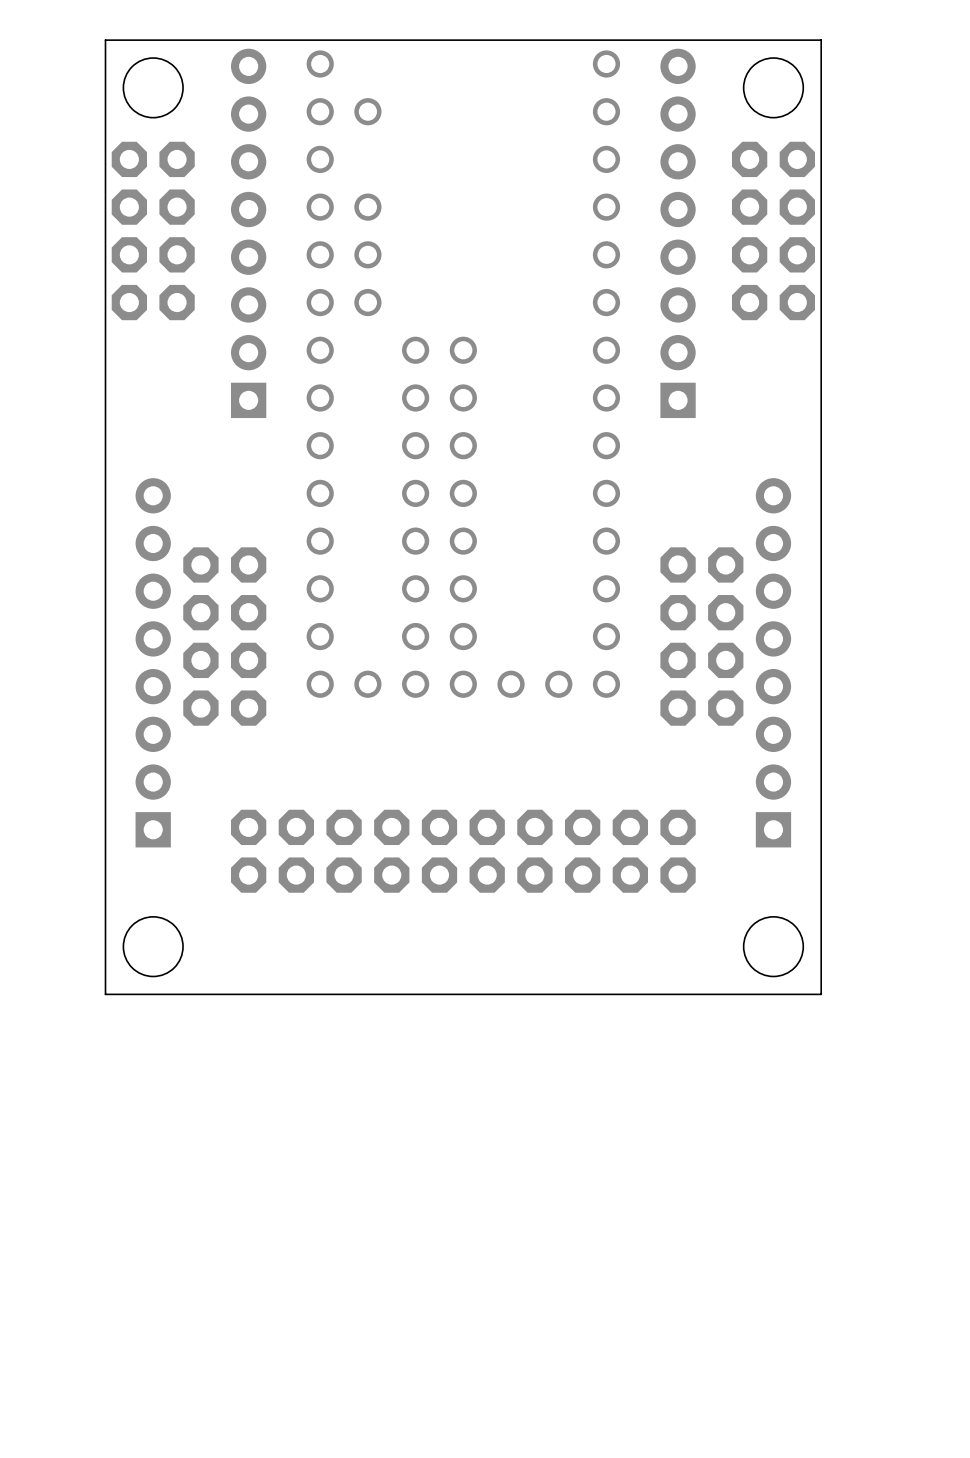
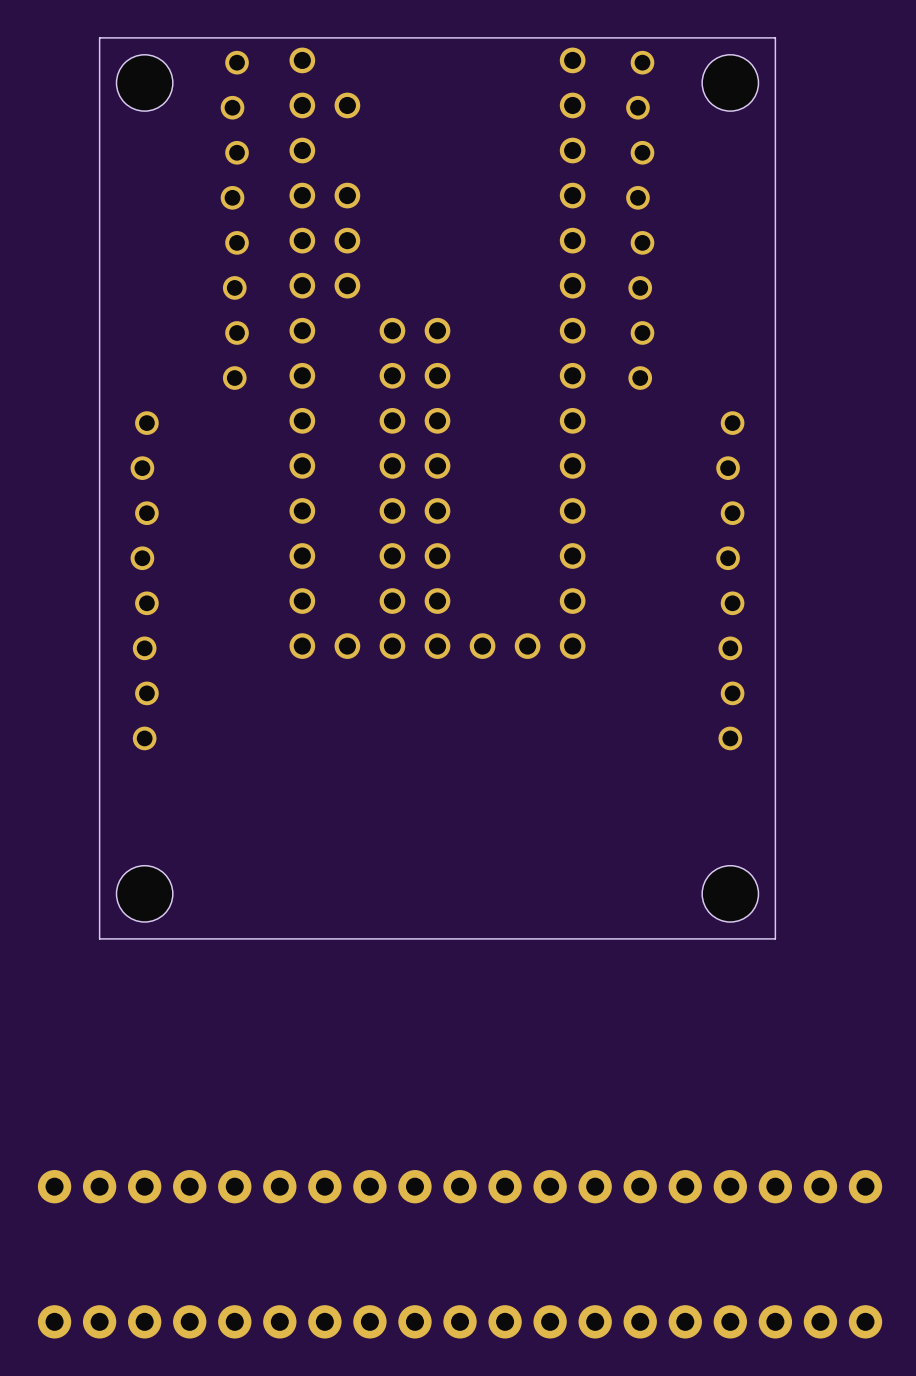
part footprint: [230, 48, 267, 419] -> [220, 50, 249, 390]
part footprint: [660, 48, 696, 419] -> [626, 50, 655, 390]
part: (153, 230) -> none
part: (773, 230) -> none
part: none -> (144, 580)
part: none -> (730, 580)
part: (224, 636) -> none
part: (701, 636) -> none
part: (153, 662) -> none
part: (773, 662) -> none
part: (463, 851) -> none
part: none -> (460, 1186)
part: none -> (460, 1321)

